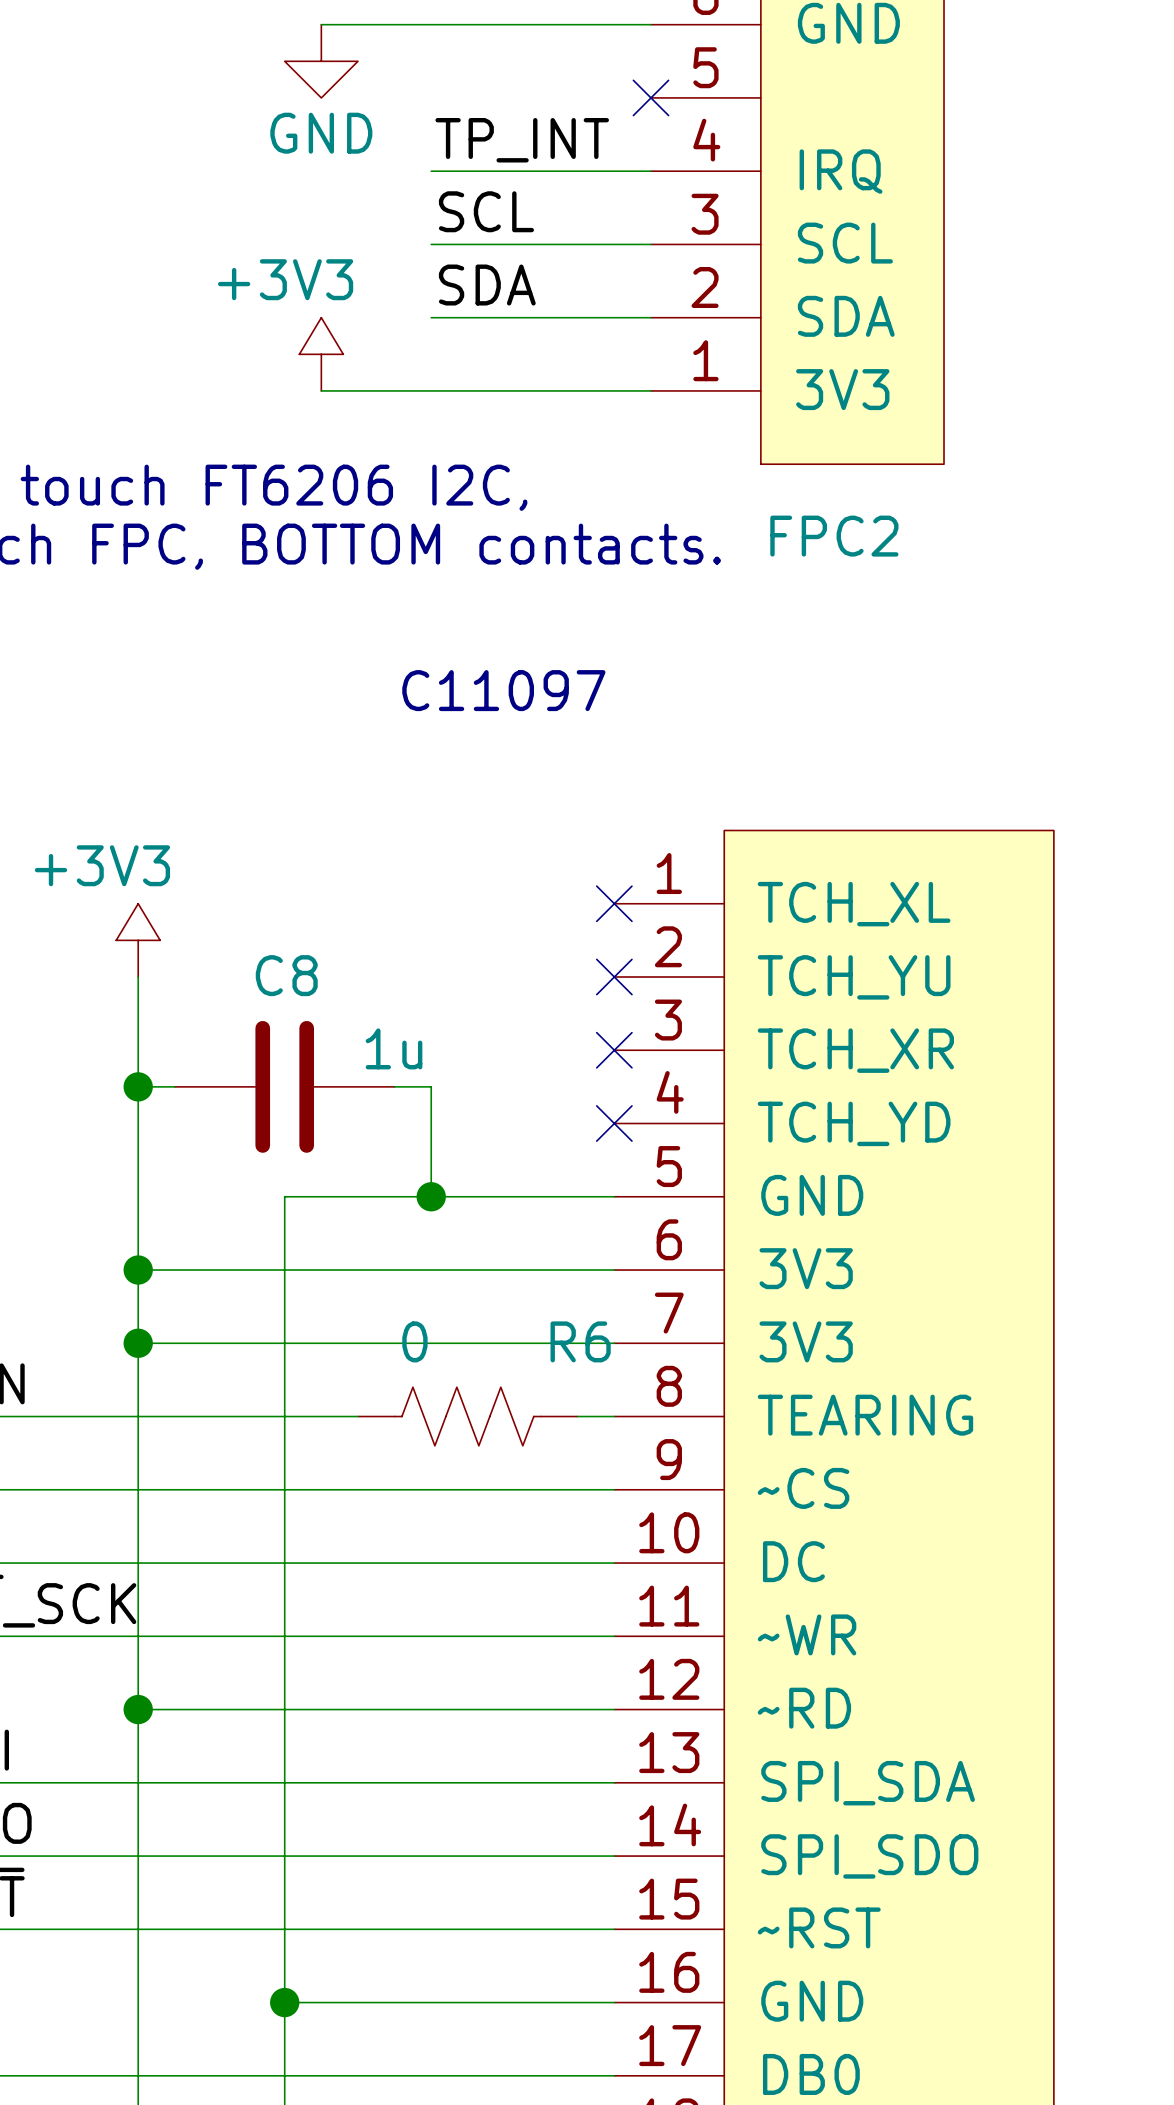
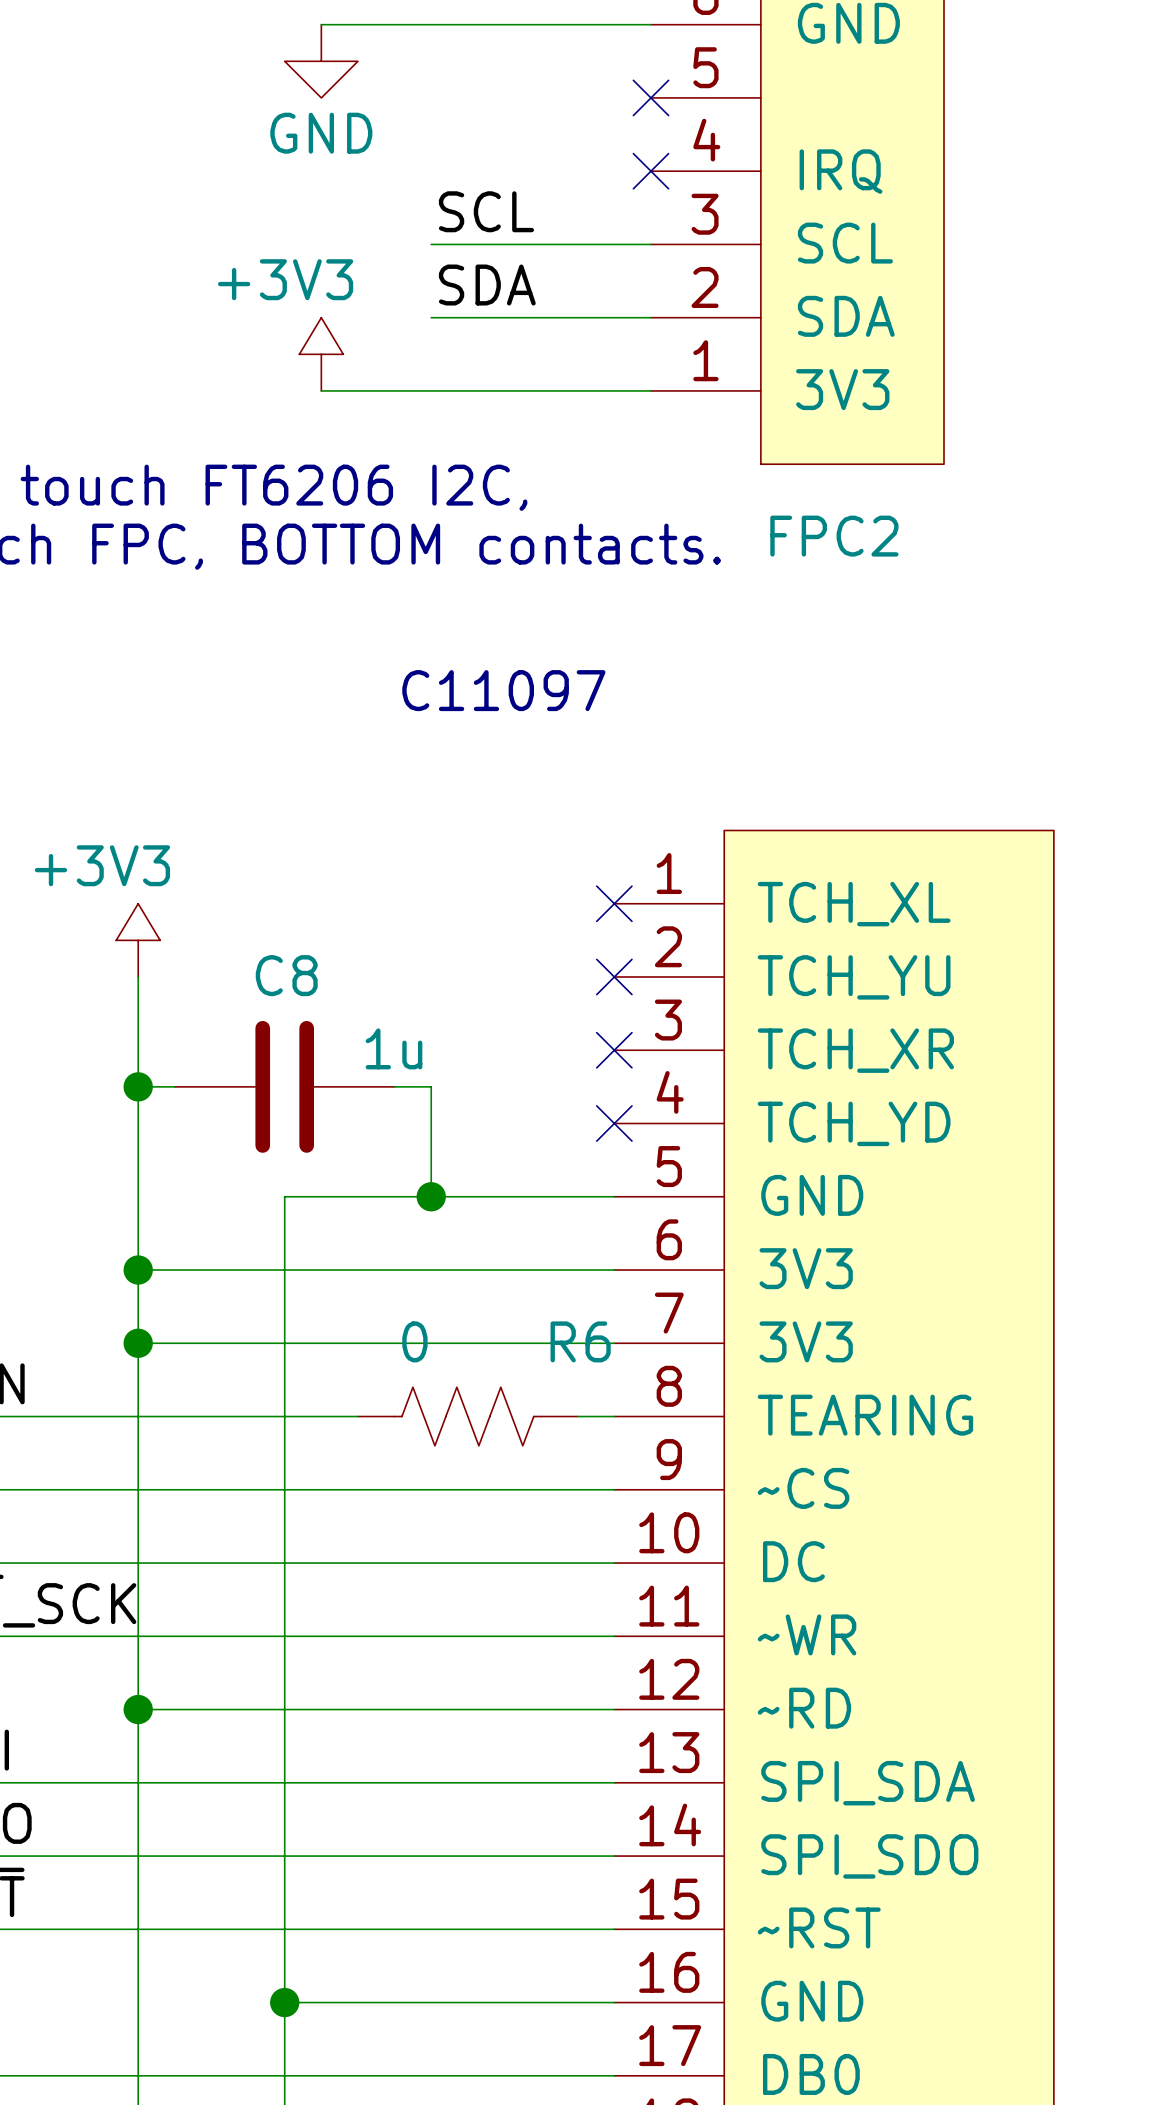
label: TP_INT (522, 140) -> none
wire: (431, 171) (650, 171) -> none
no-connect mark: none -> (650, 171)

